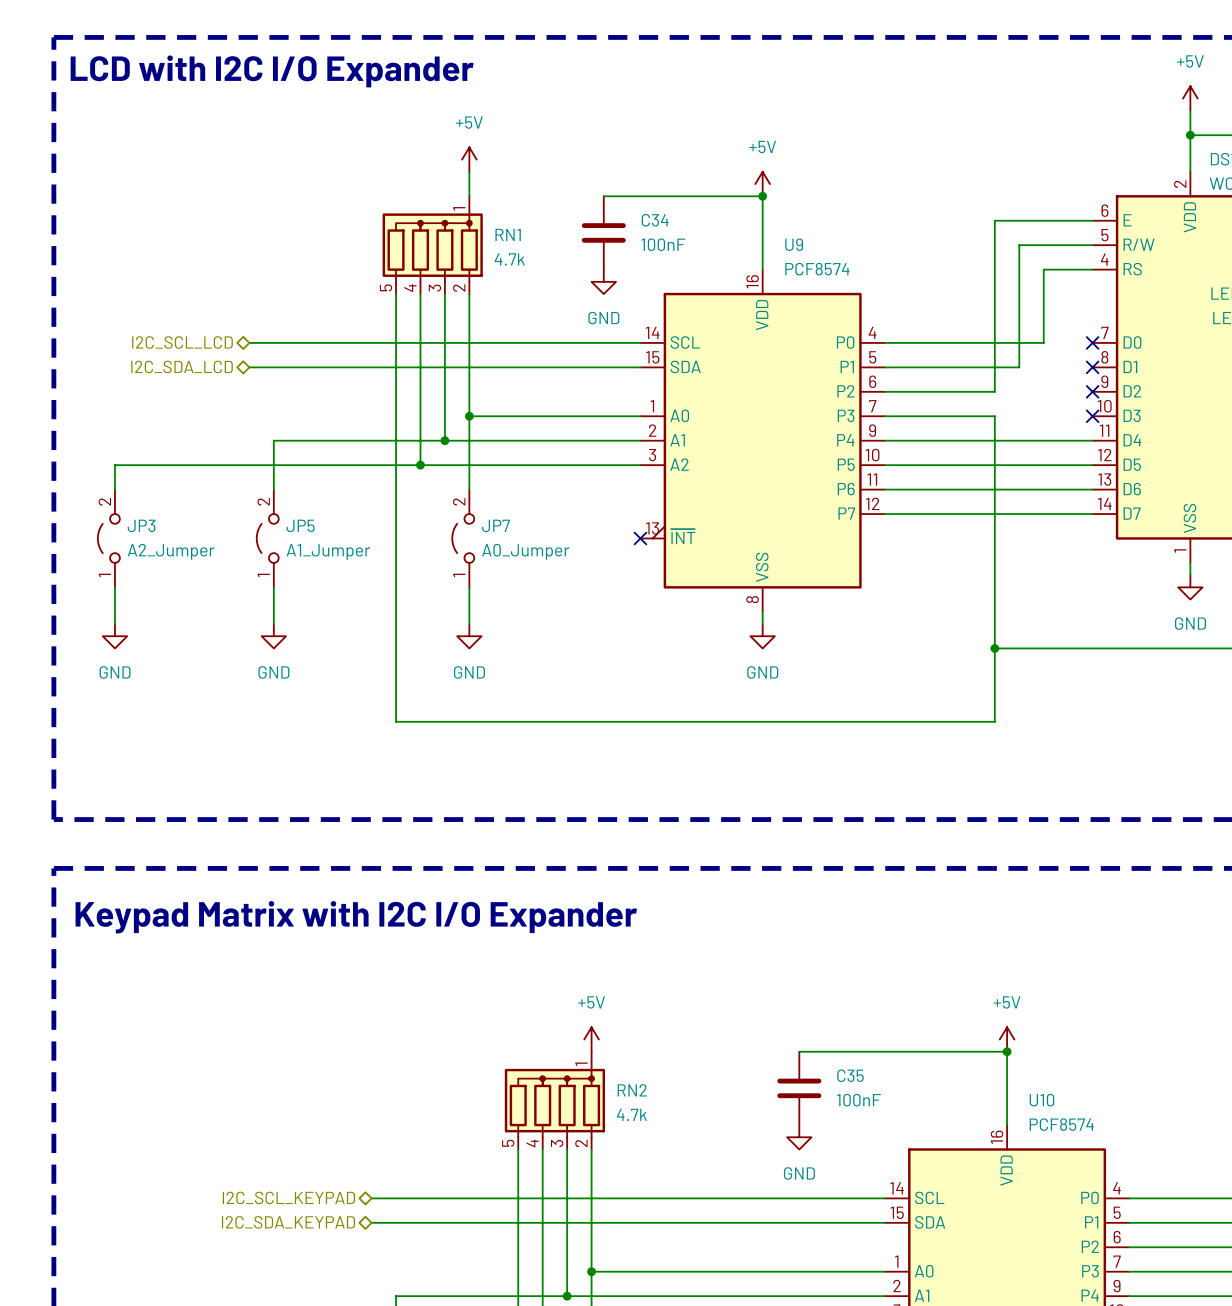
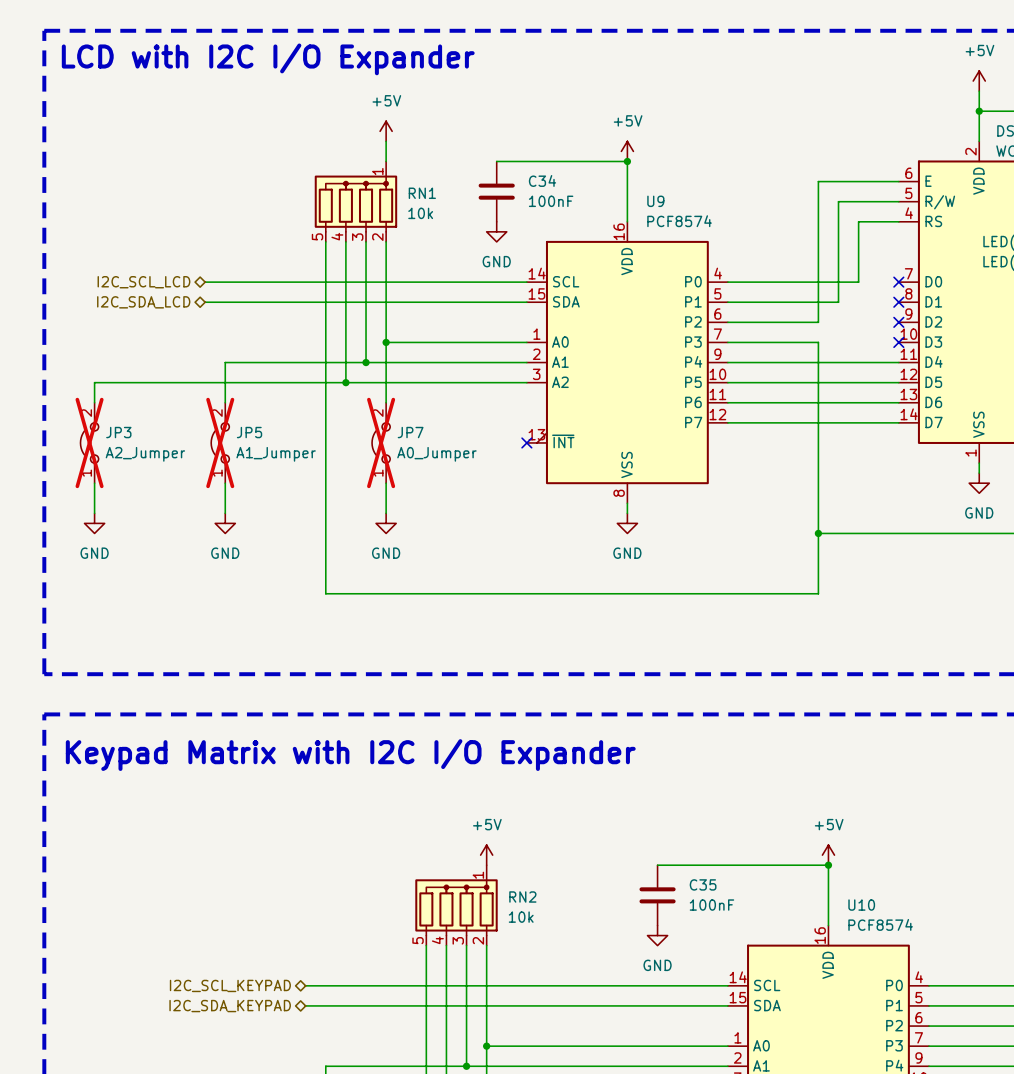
RN1 value: 4.7k (509, 259) -> 10k (420, 213)
JP3 do-not-place cross: none -> (89, 442)
JP5 do-not-place cross: none -> (220, 442)
JP7 do-not-place cross: none -> (381, 442)
RN2 value: 4.7k (631, 1114) -> 10k (521, 917)

